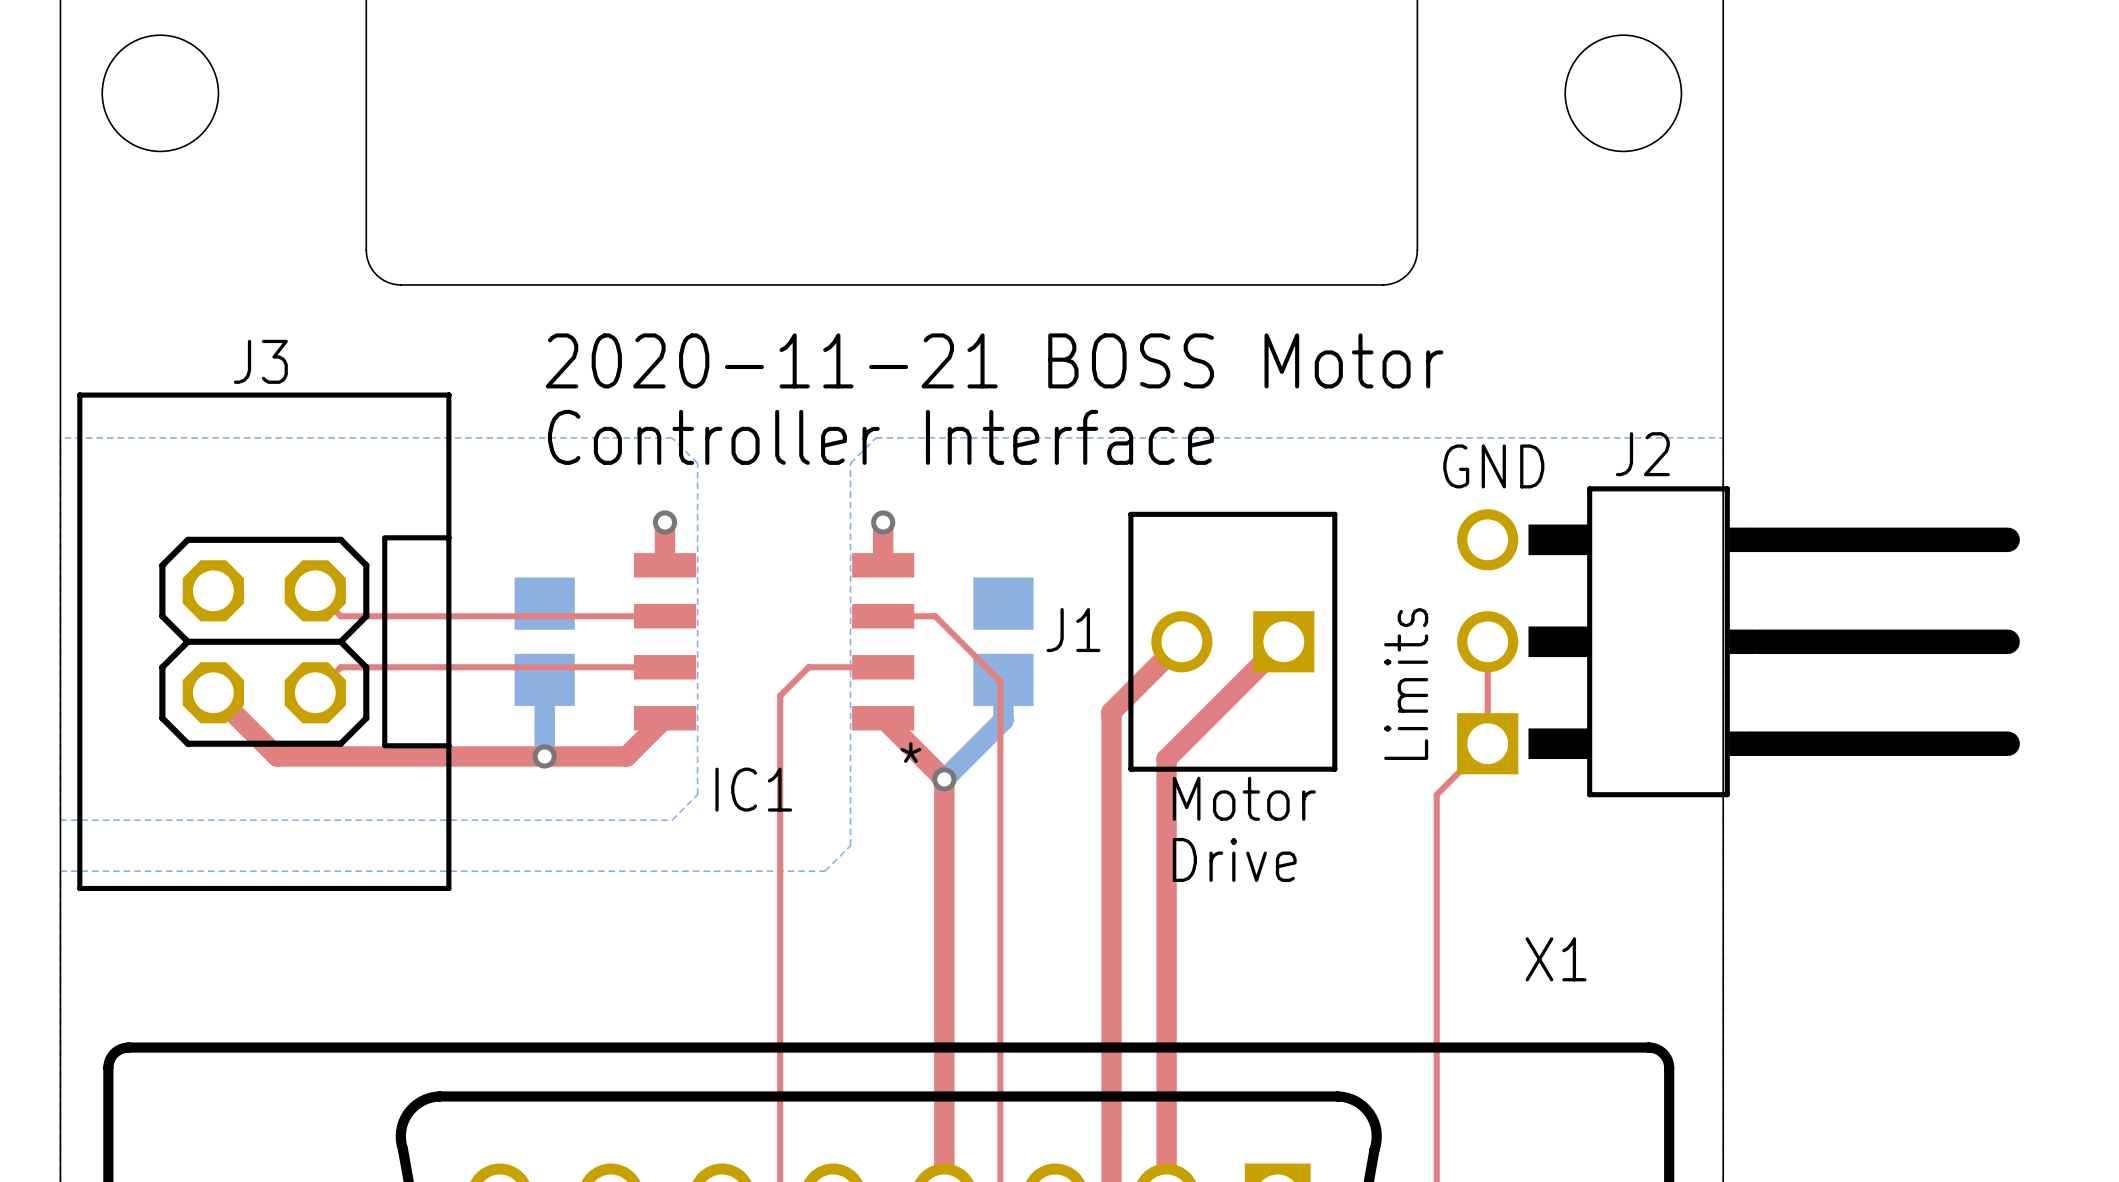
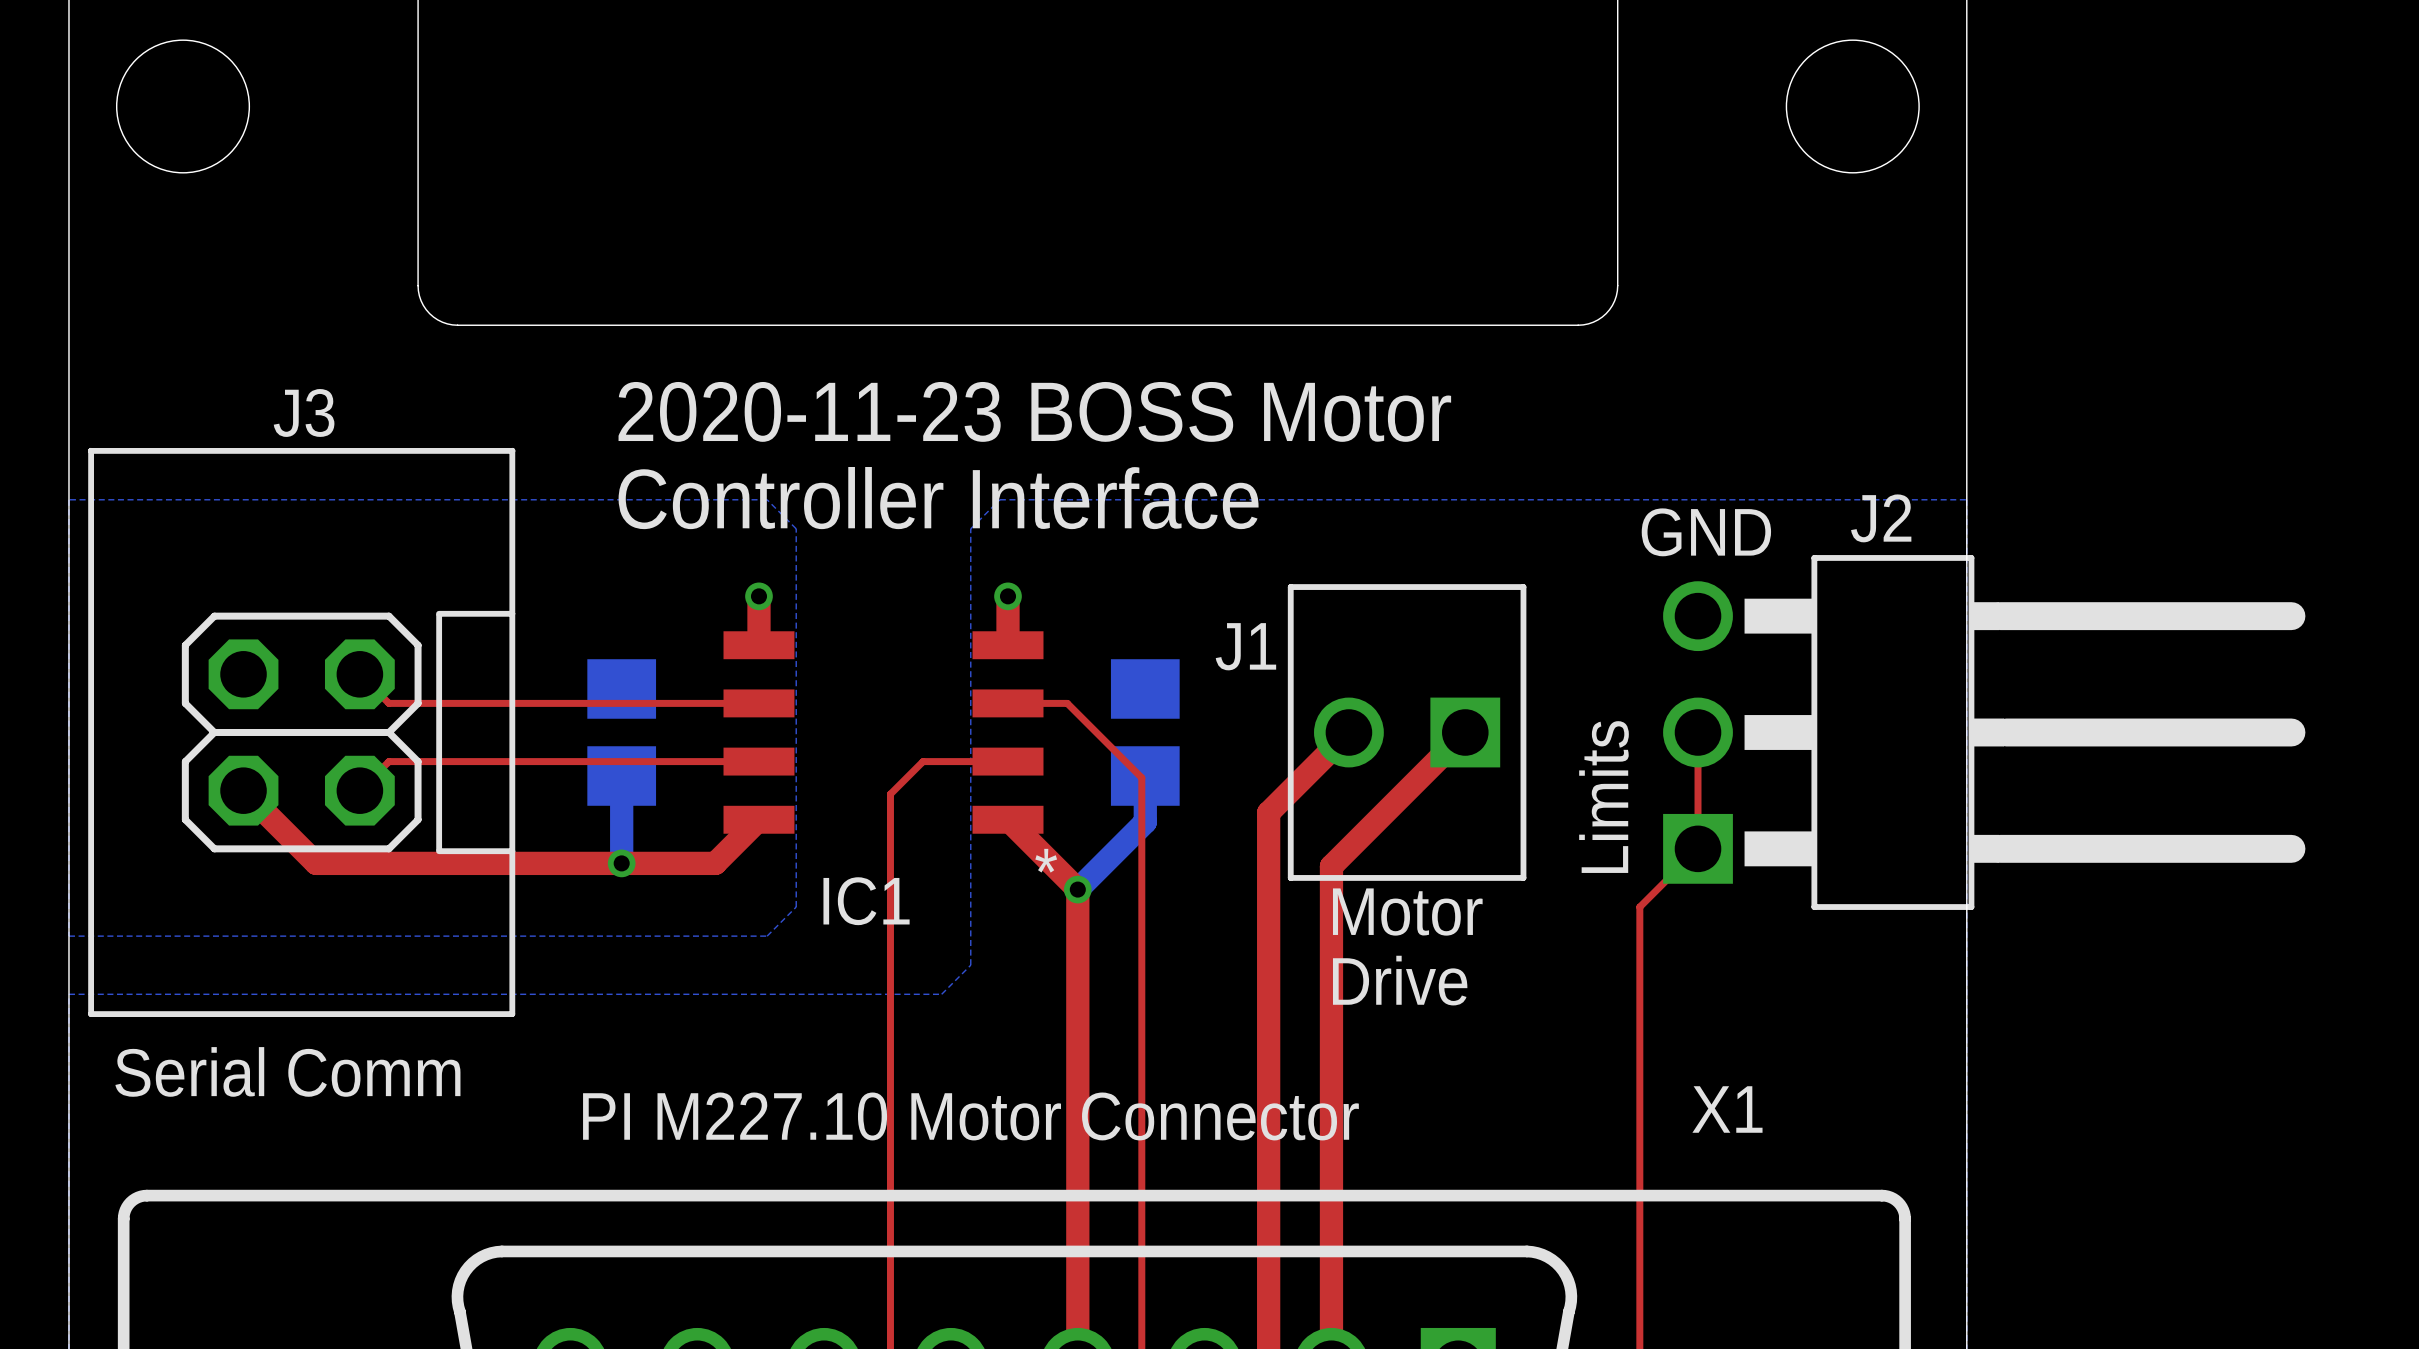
text: 2020-11-21 BOSS Motor (994, 360) -> 2020-11-23 BOSS Motor (1034, 411)
J1 name position: J1 (1073, 630) -> J1 (1245, 646)
text: none -> Serial Comm (287, 1071)
X1 name position: X1 (1556, 959) -> X1 (1727, 1109)
text: none -> PI M227.10 Motor Connector (970, 1116)

